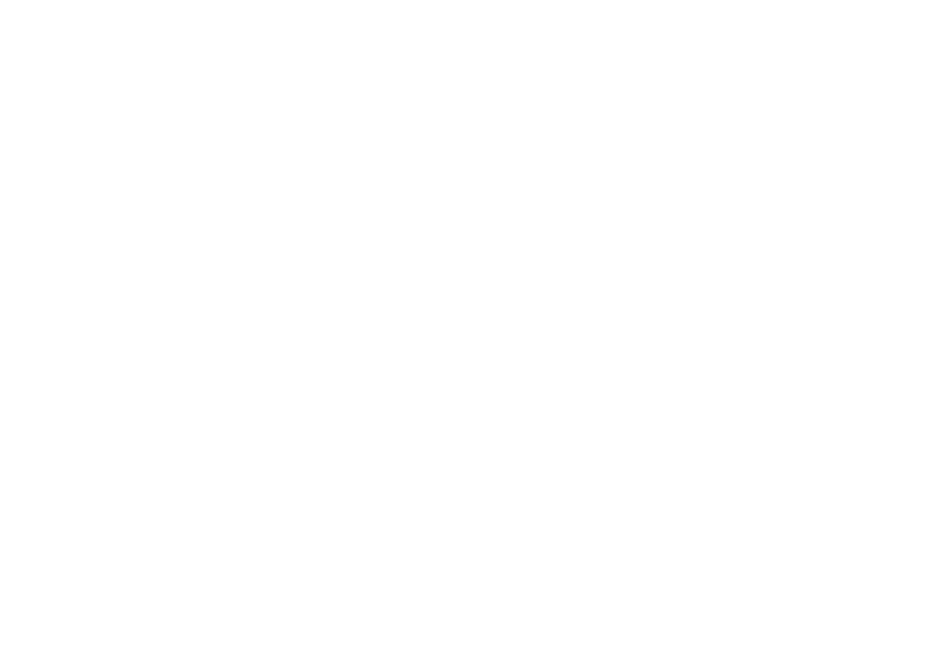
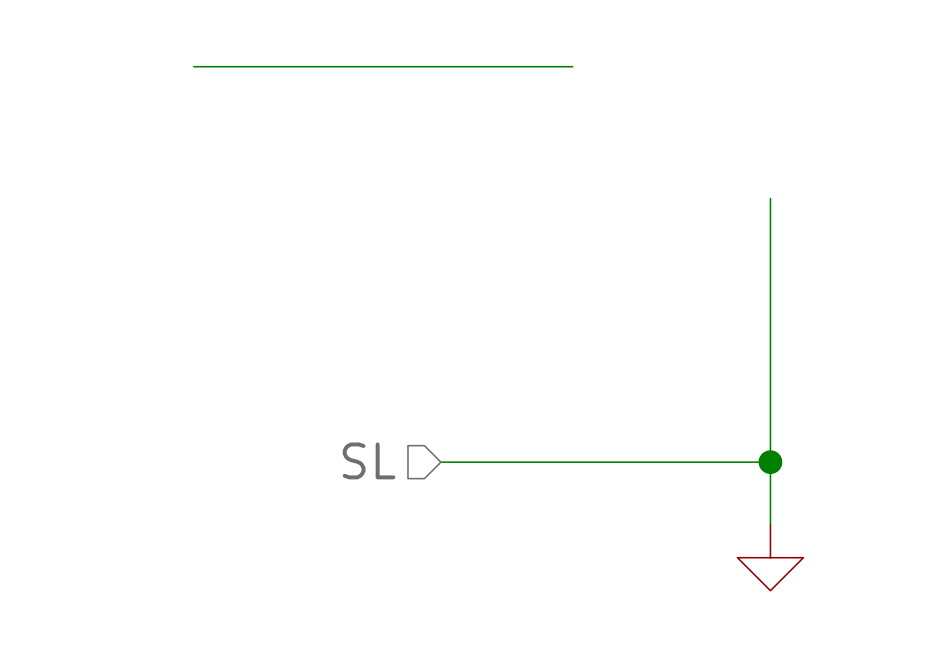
wire: none -> (193, 66) (572, 66)
wire: none -> (770, 198) (770, 524)
hierarchical label: none -> SL (369, 460)
wire: none -> (440, 462) (770, 462)
junction: none -> (770, 462)
power symbol: none -> (770, 557)

